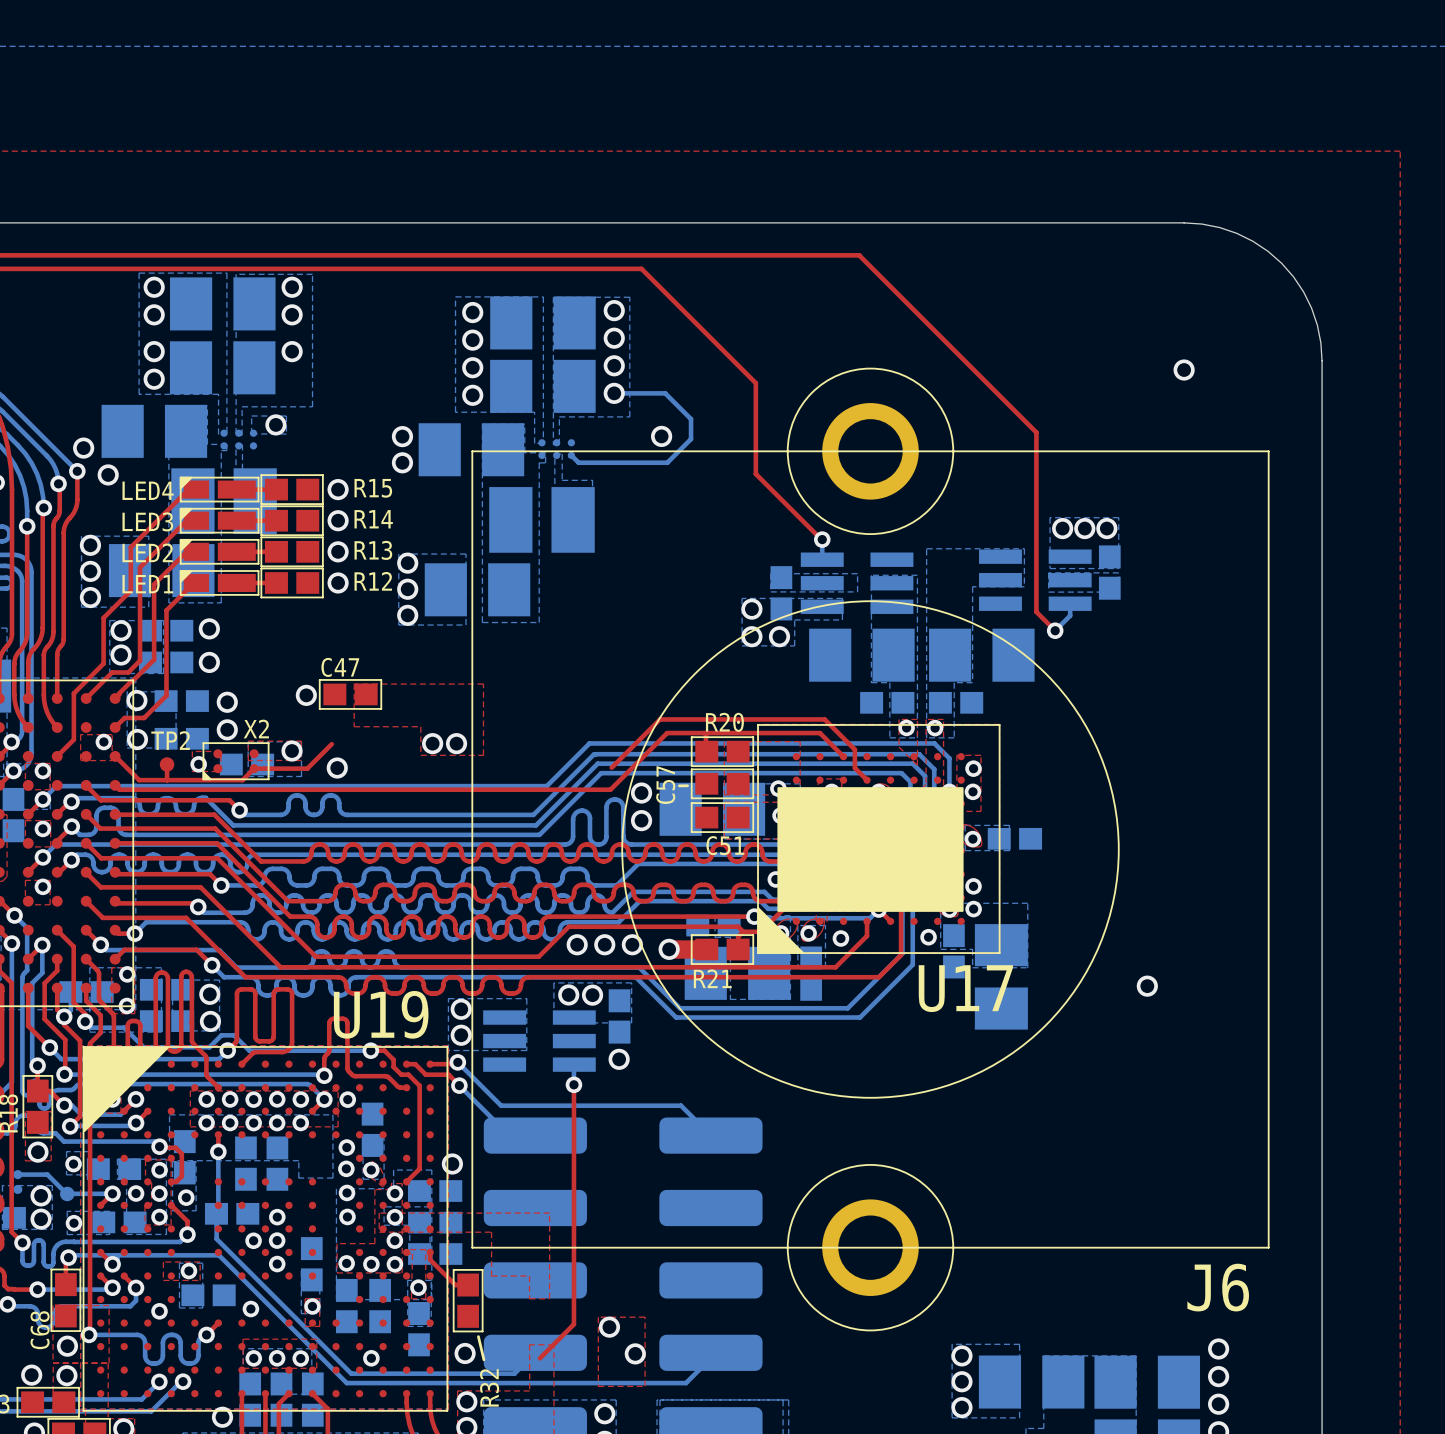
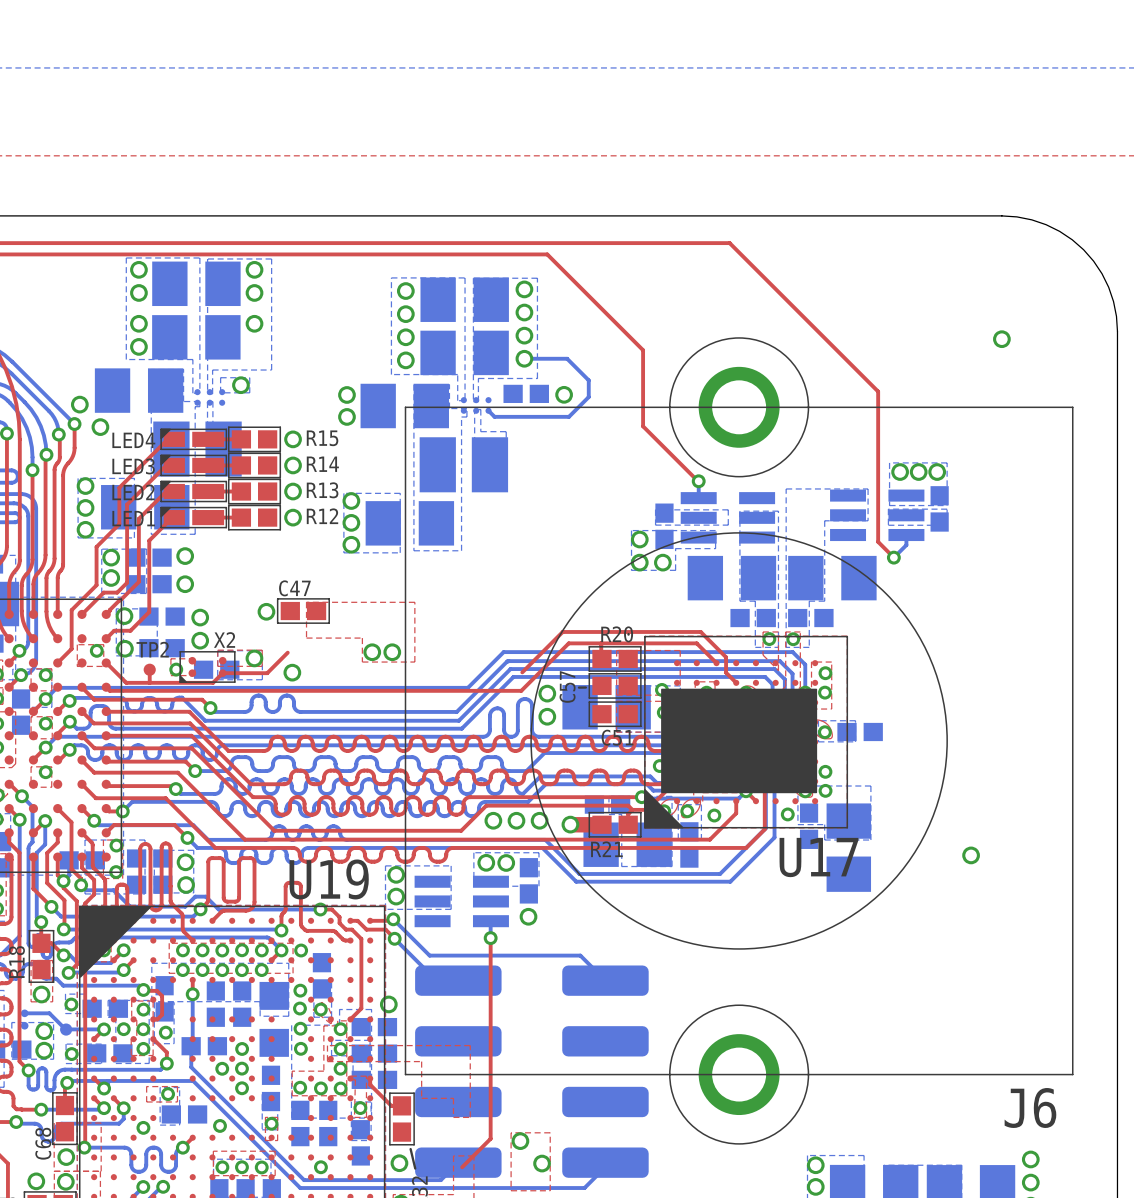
part: none -> (526, 393)
part: none -> (274, 1019)

